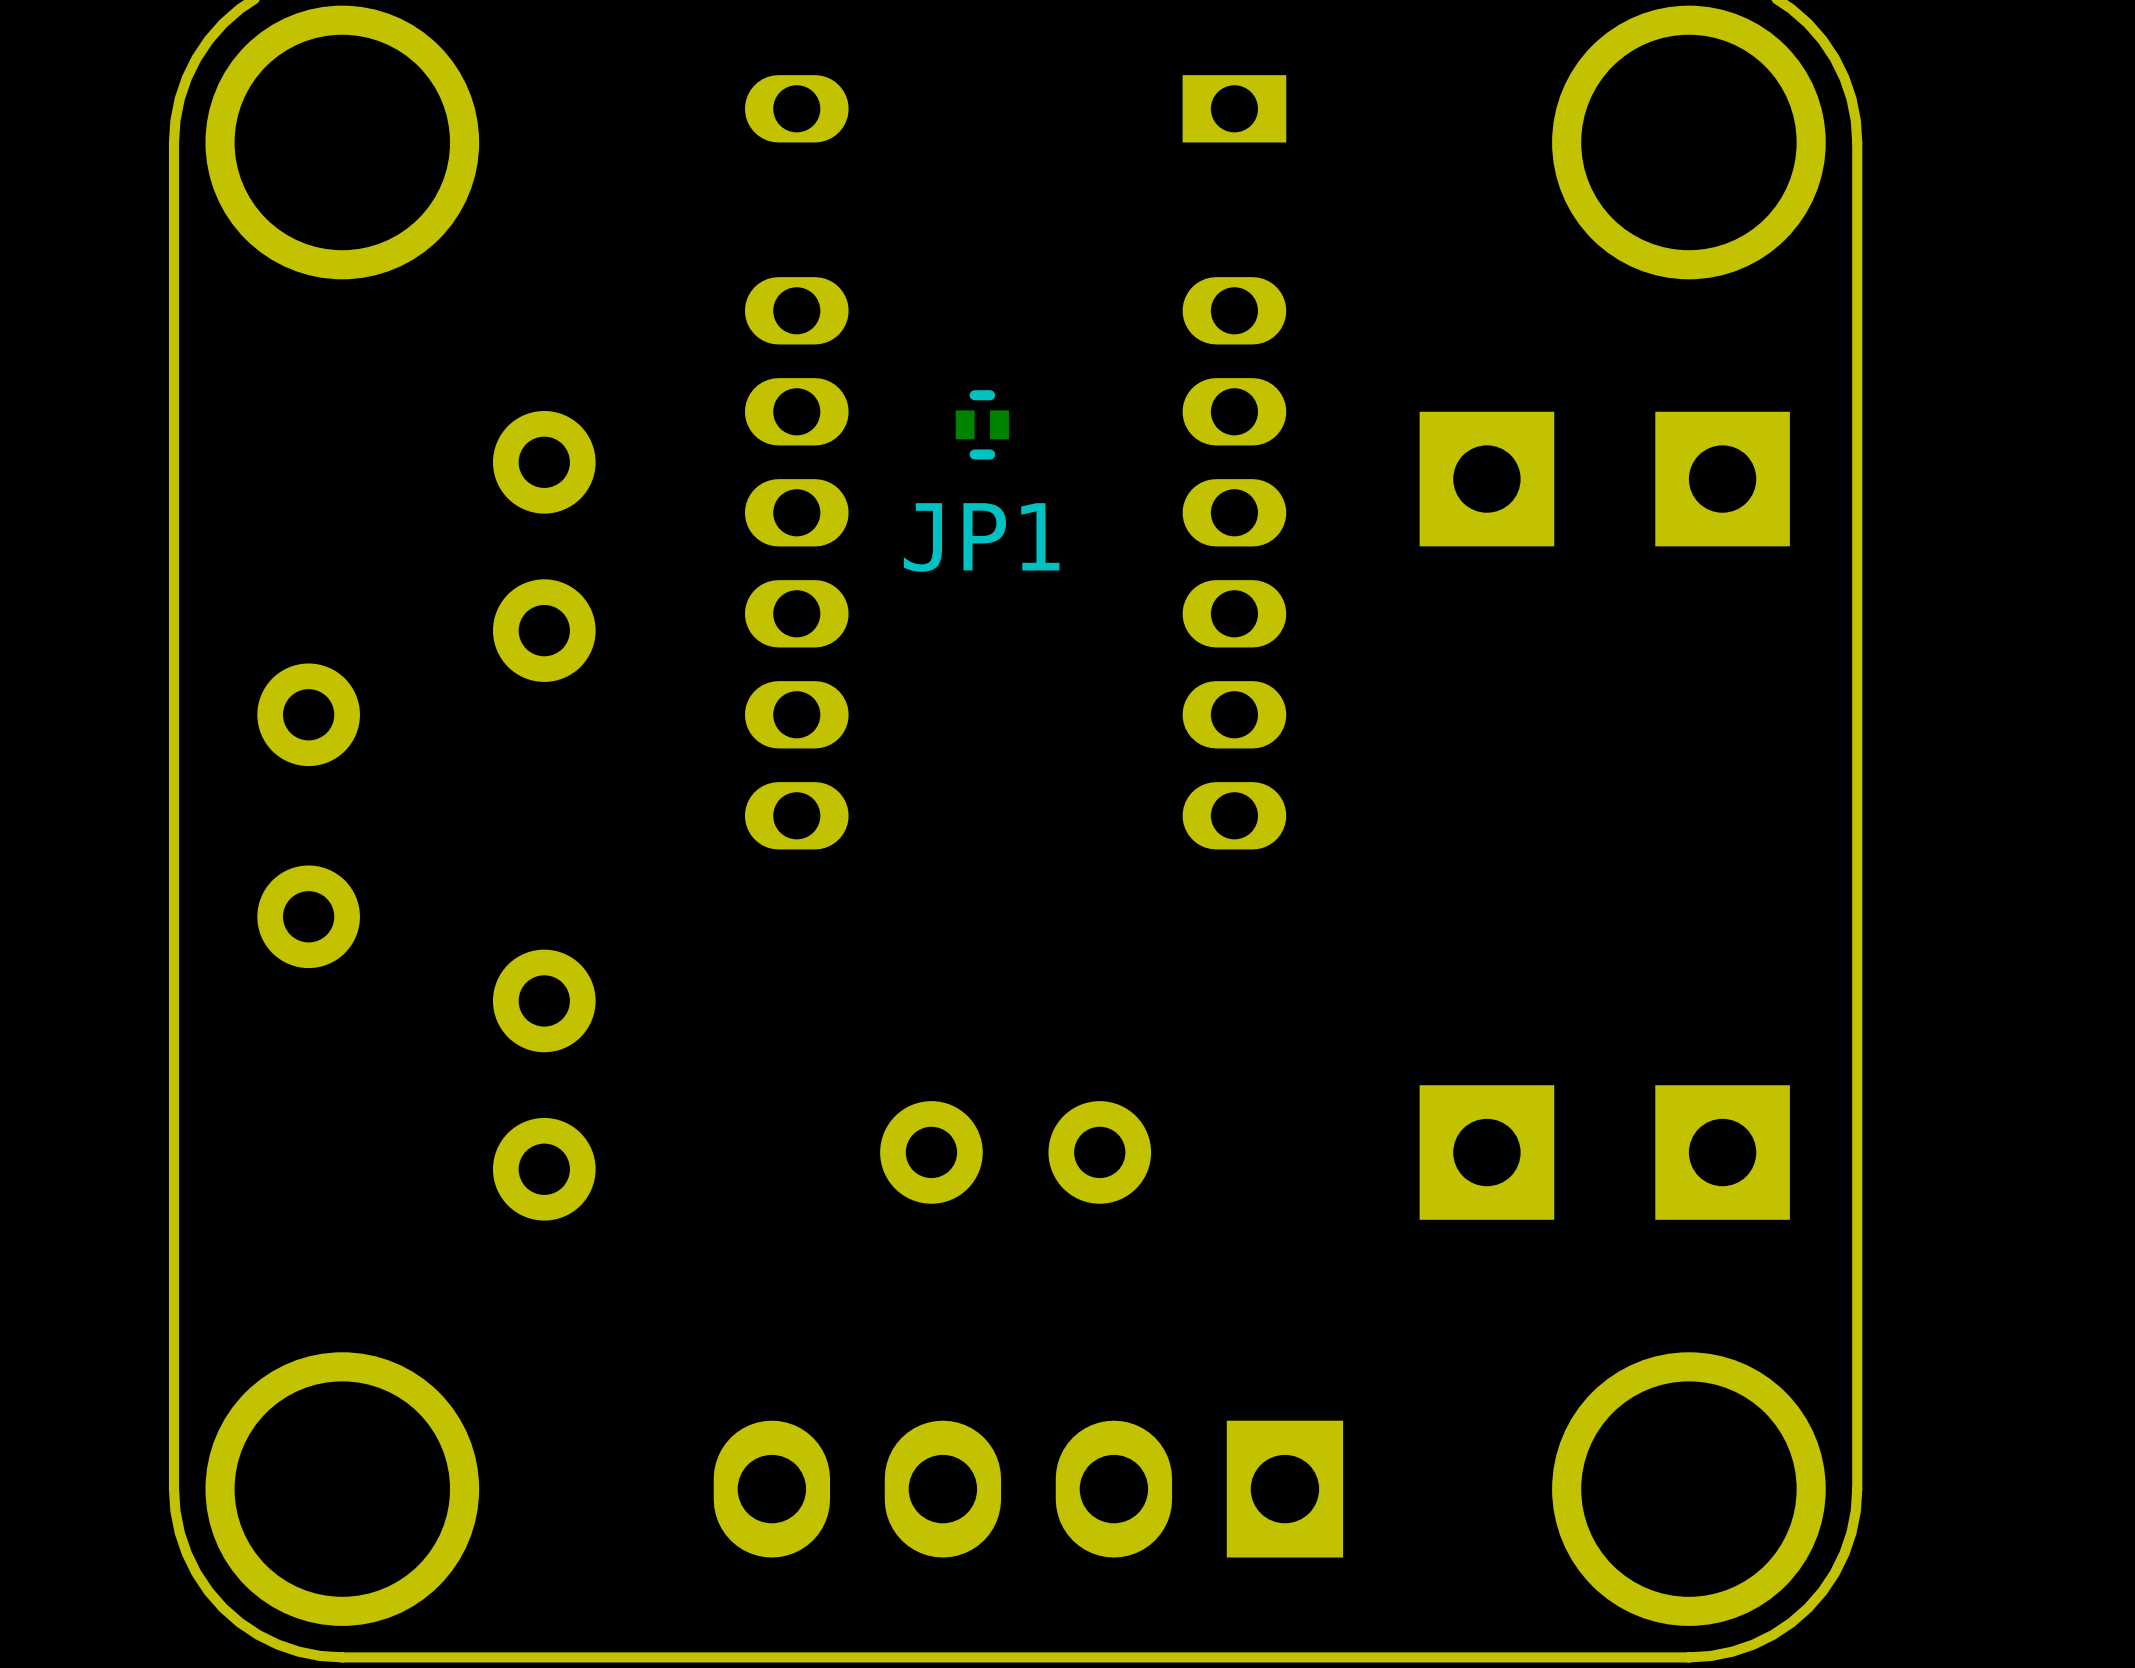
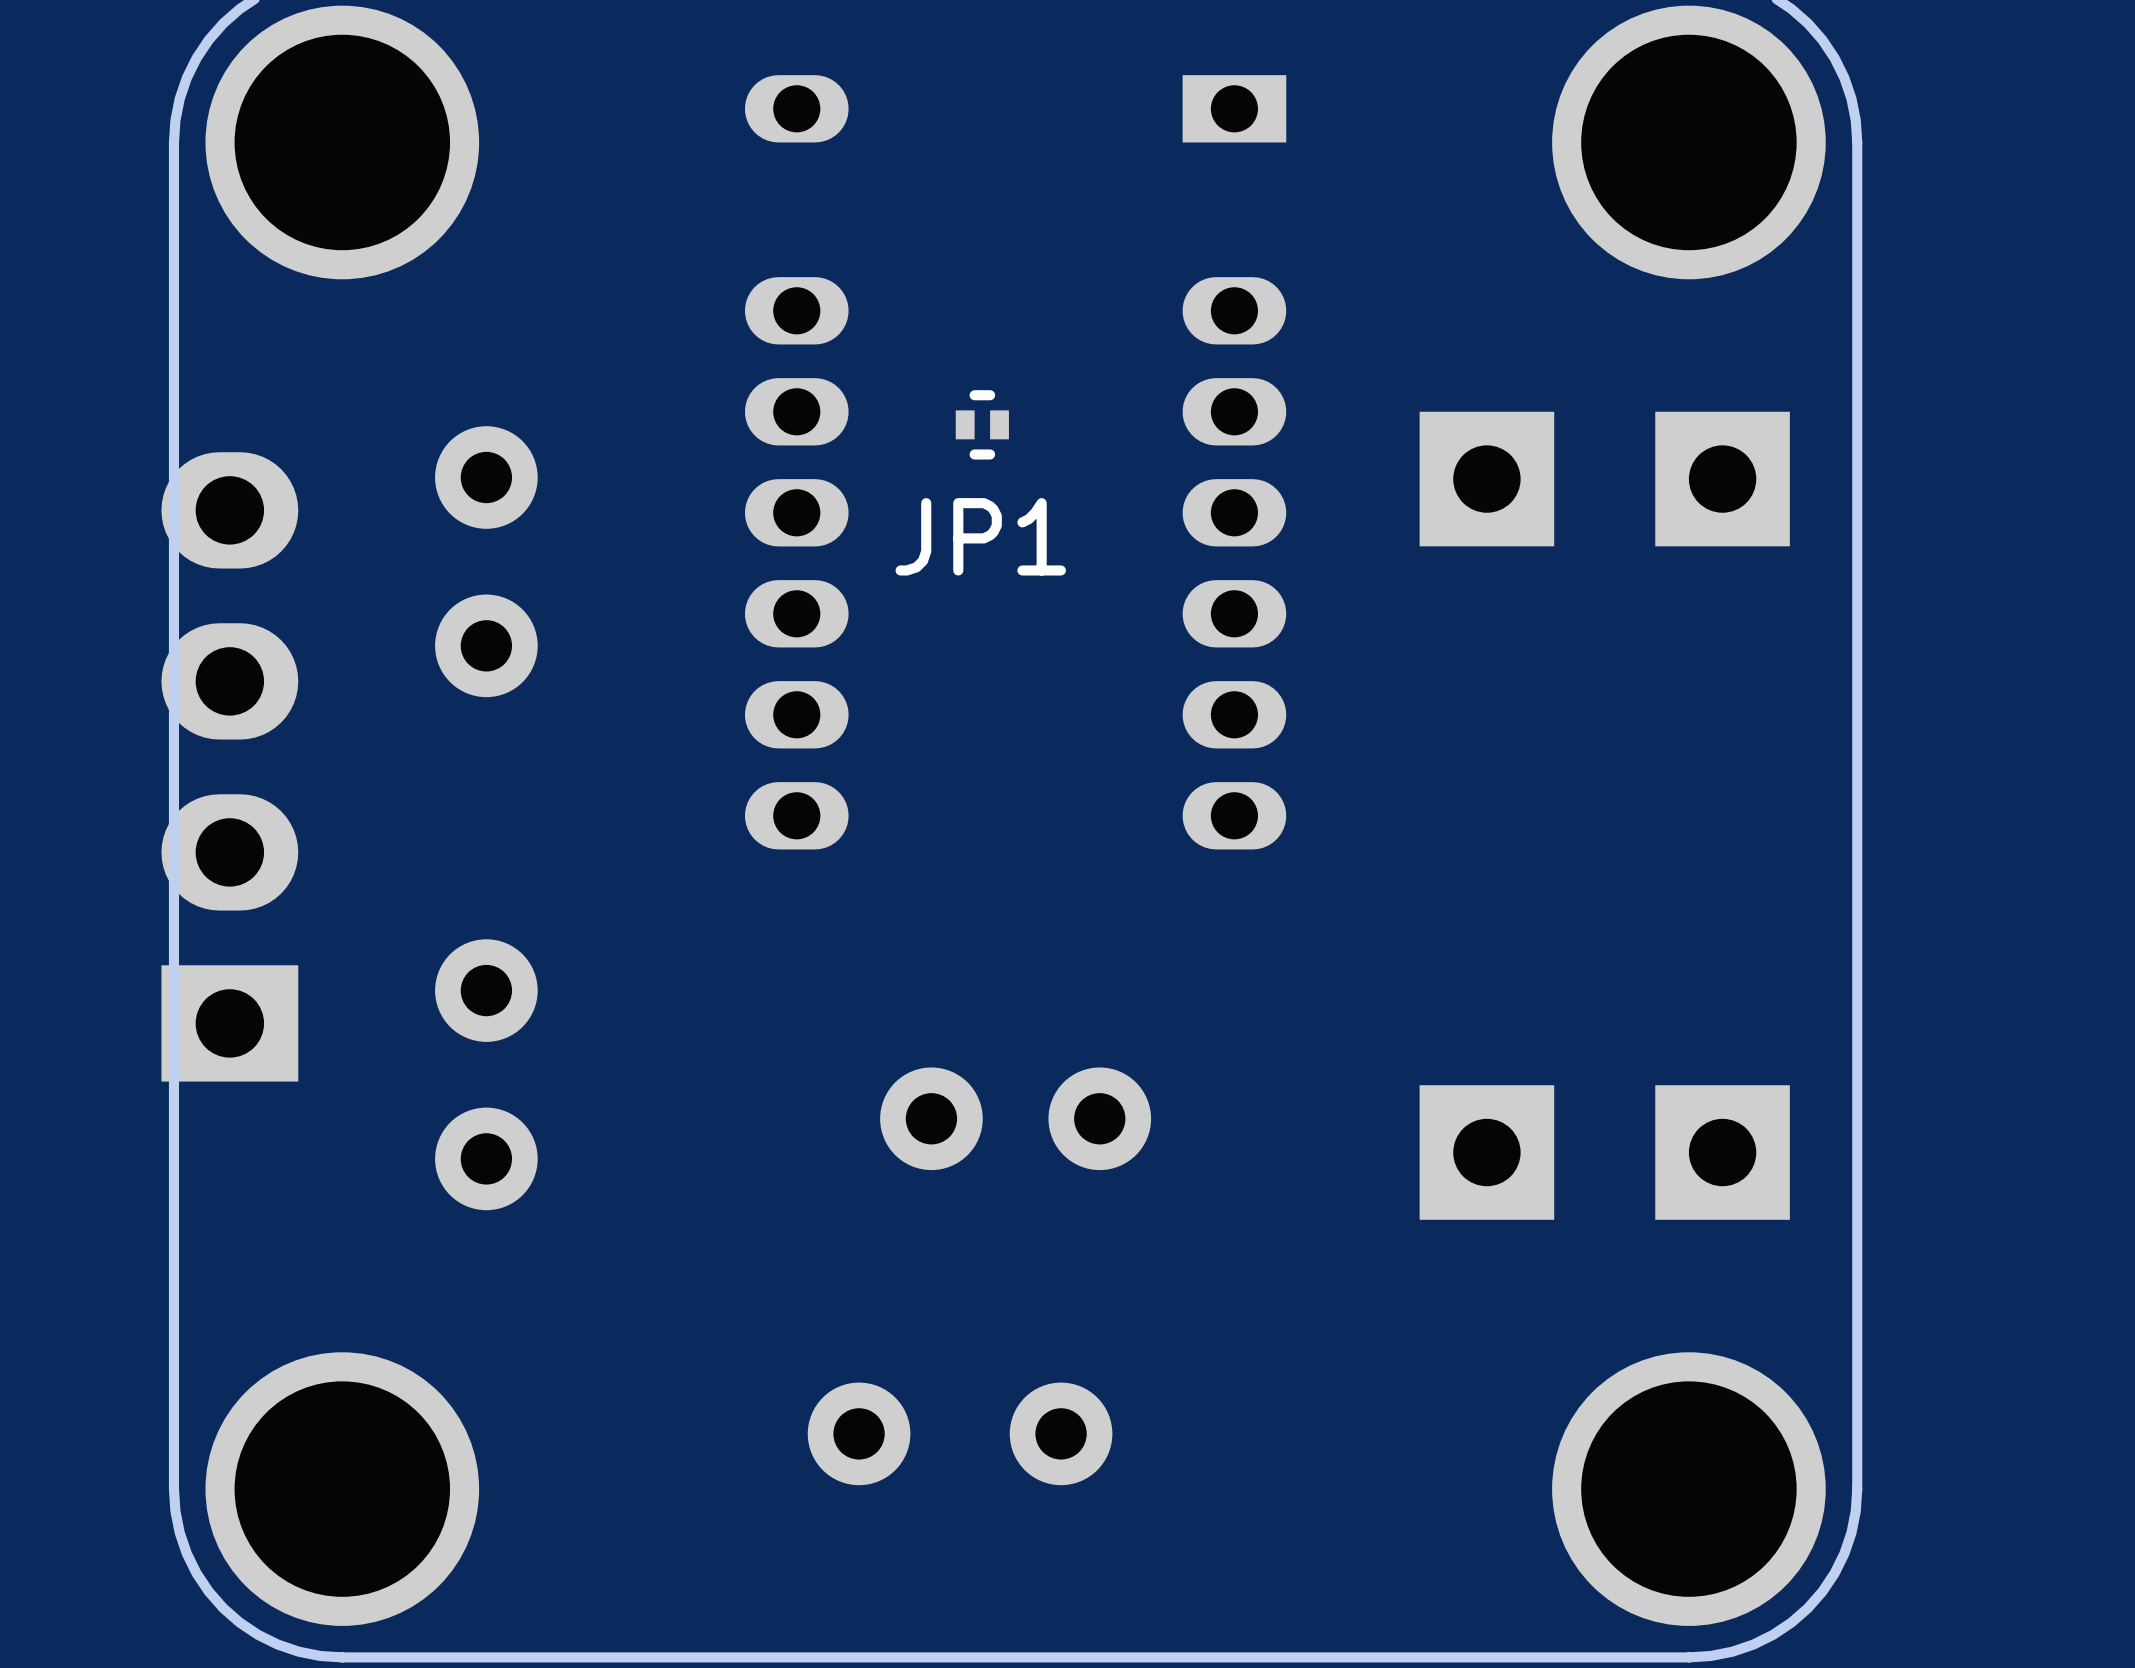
part position: (544, 546) -> (486, 561)
part rotation: 0° (308, 815) -> 90° clockwise (960, 1433)
part position: (308, 815) -> (960, 1433)
part position: (544, 1085) -> (486, 1074)
part position: (1015, 1152) -> (1015, 1118)
part rotation: 0° (1028, 1489) -> 90° clockwise (229, 766)
part position: (1028, 1489) -> (229, 766)

